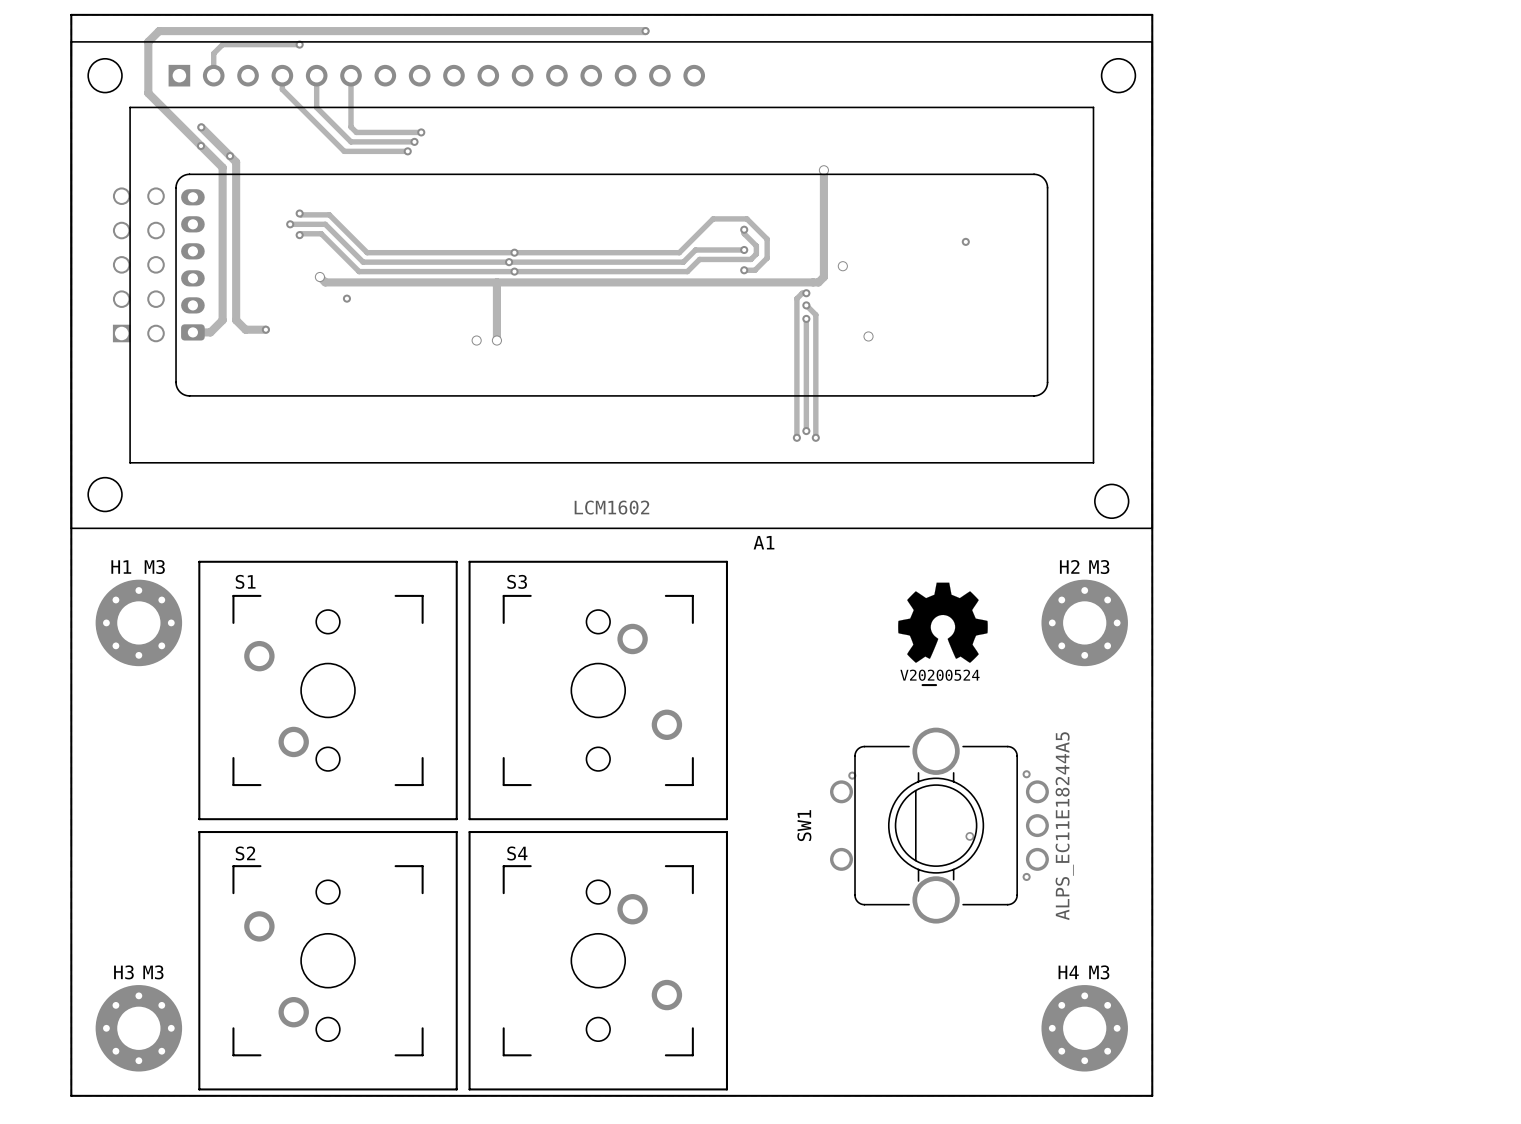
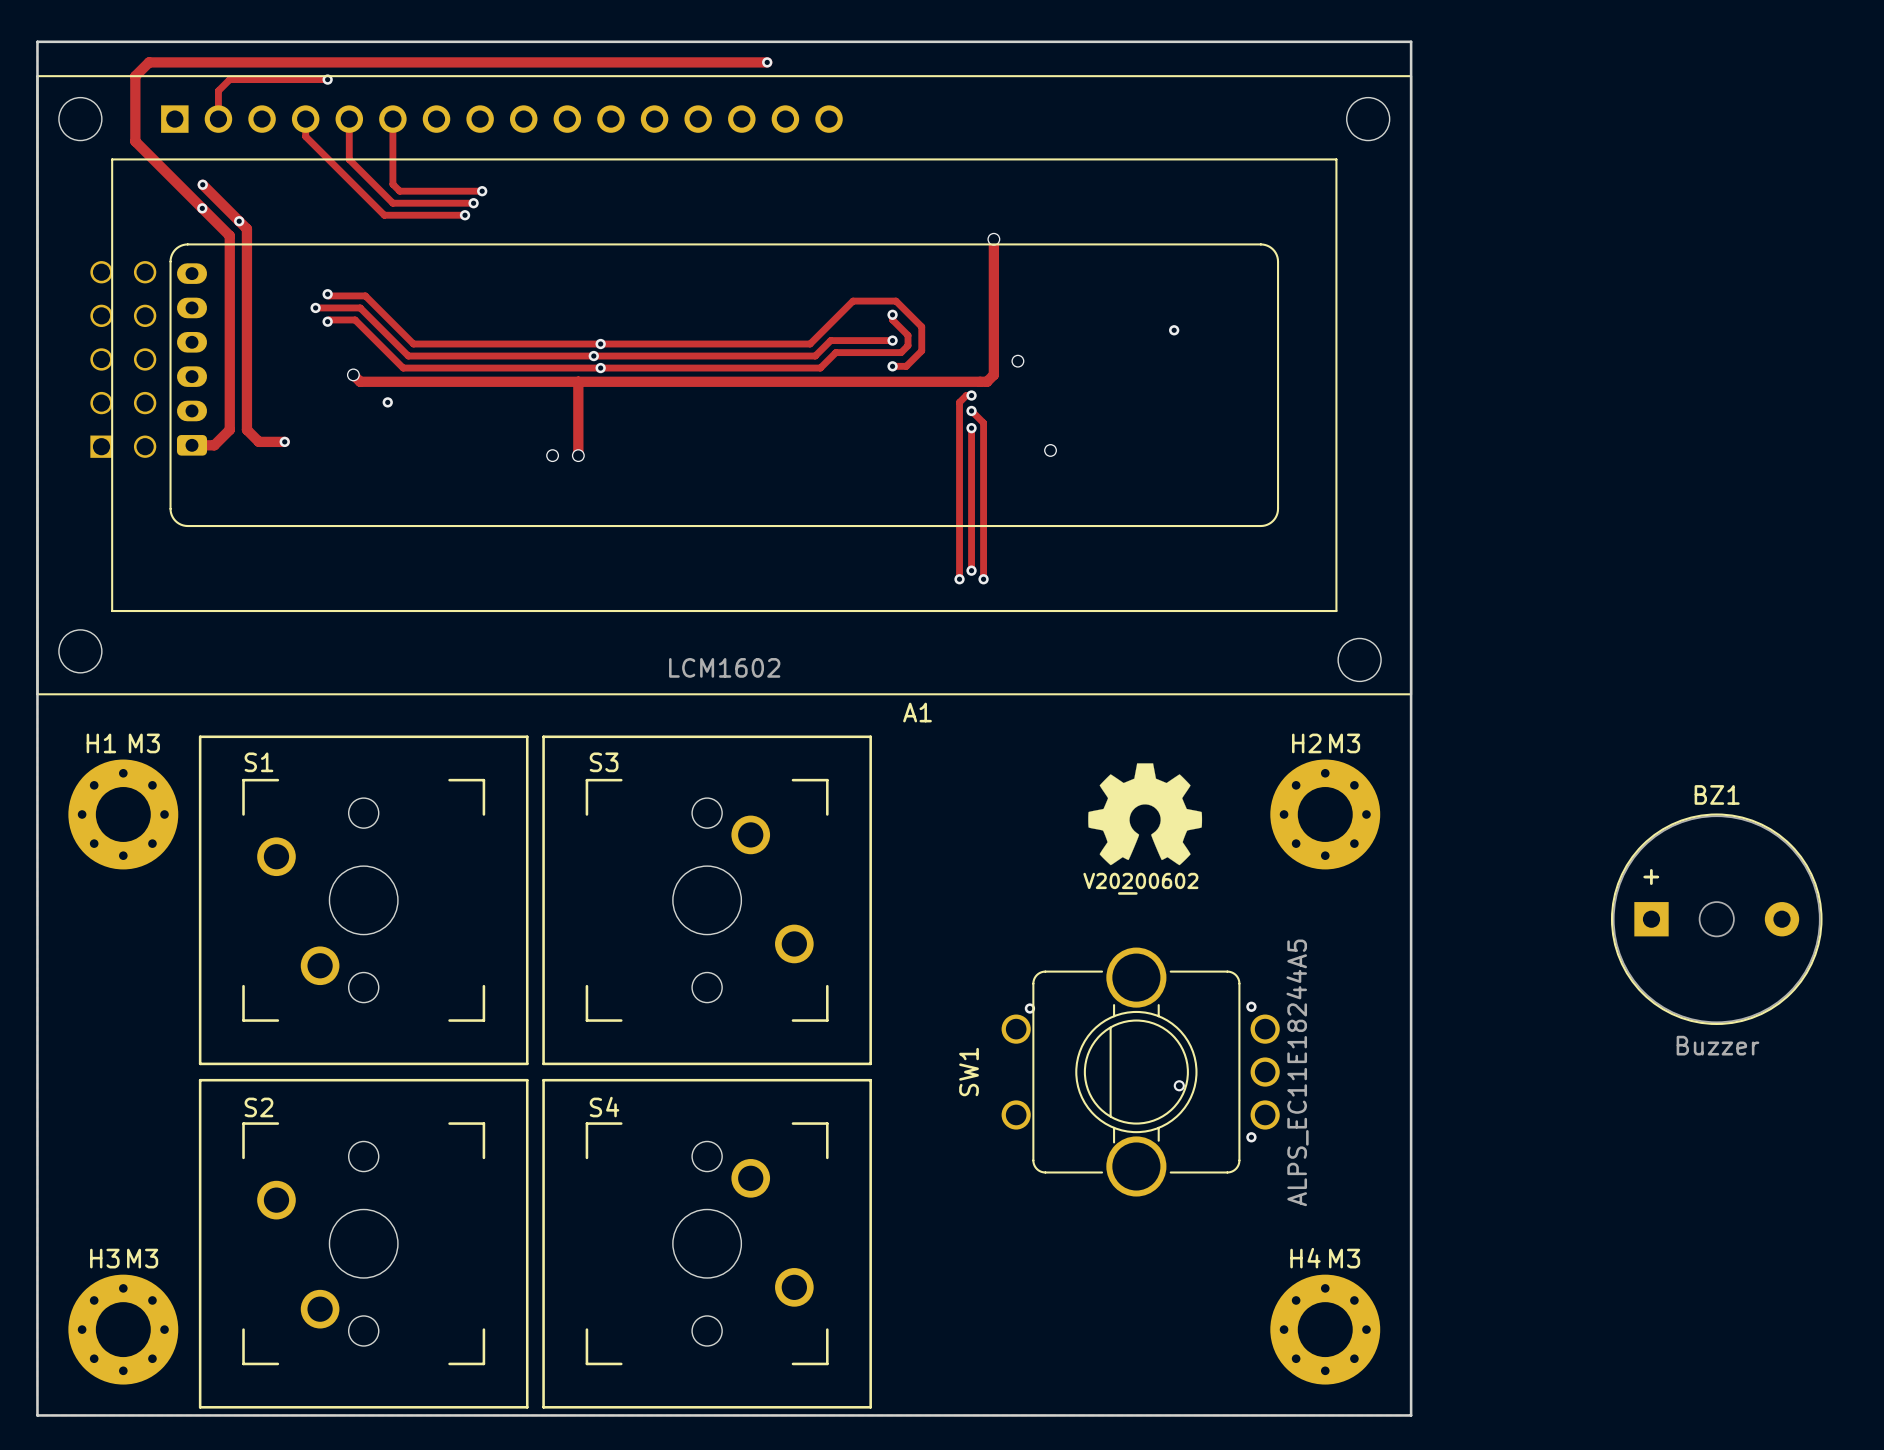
drawing shape: [900, 669, 980, 687] -> [1083, 872, 1199, 895]
BZ1: none -> Buzzer (1716, 919)

